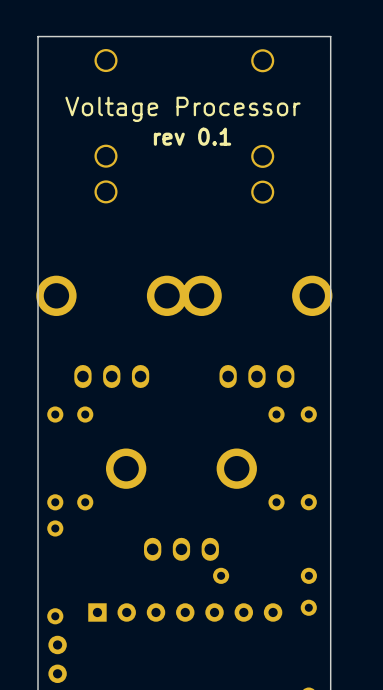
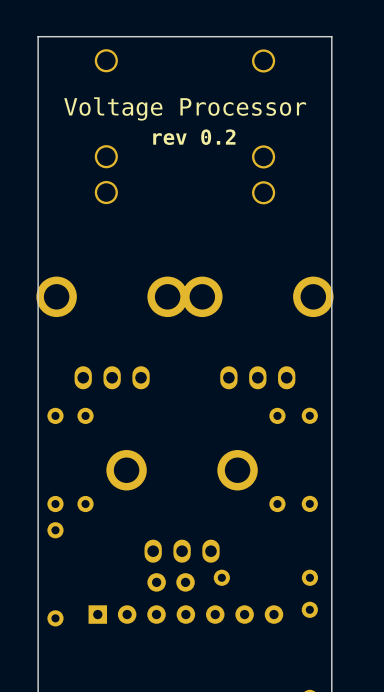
text: rev 0.1 (192, 136) -> rev 0.2 (194, 137)
part rotation: 0° (57, 659) -> 90° clockwise (171, 582)
part position: (57, 659) -> (171, 582)

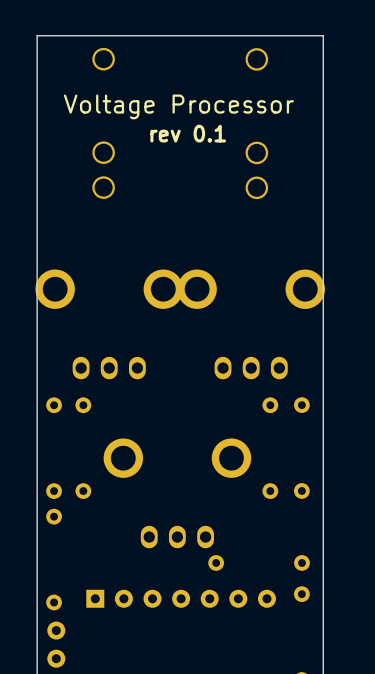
text: rev 0.2 (194, 137) -> rev 0.1 (188, 133)
part rotation: 0° (171, 582) -> 90° clockwise (56, 644)
part position: (171, 582) -> (56, 644)

